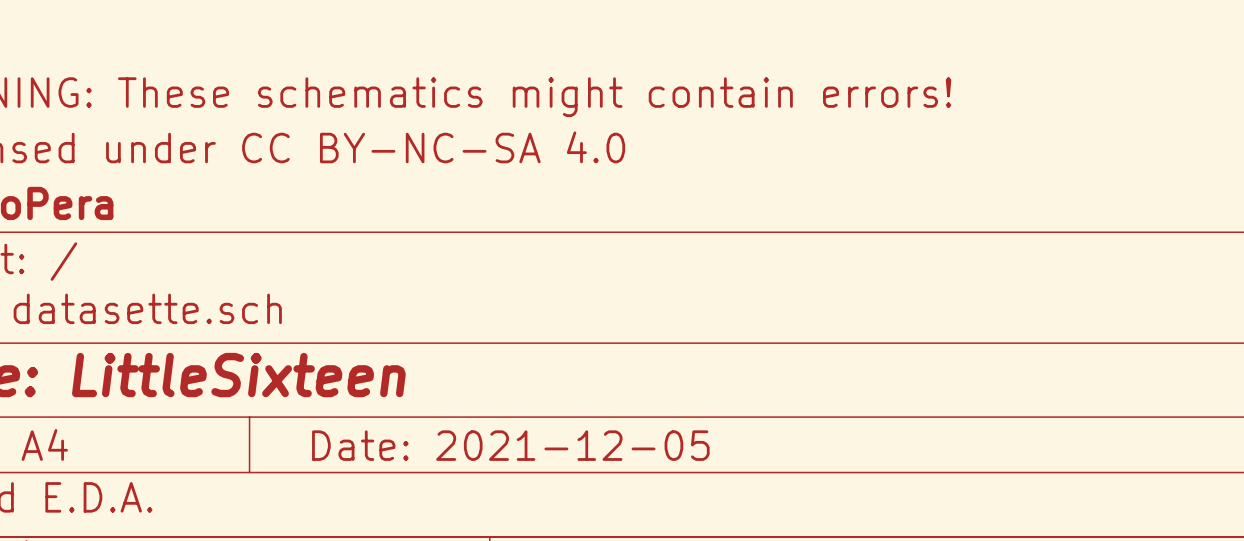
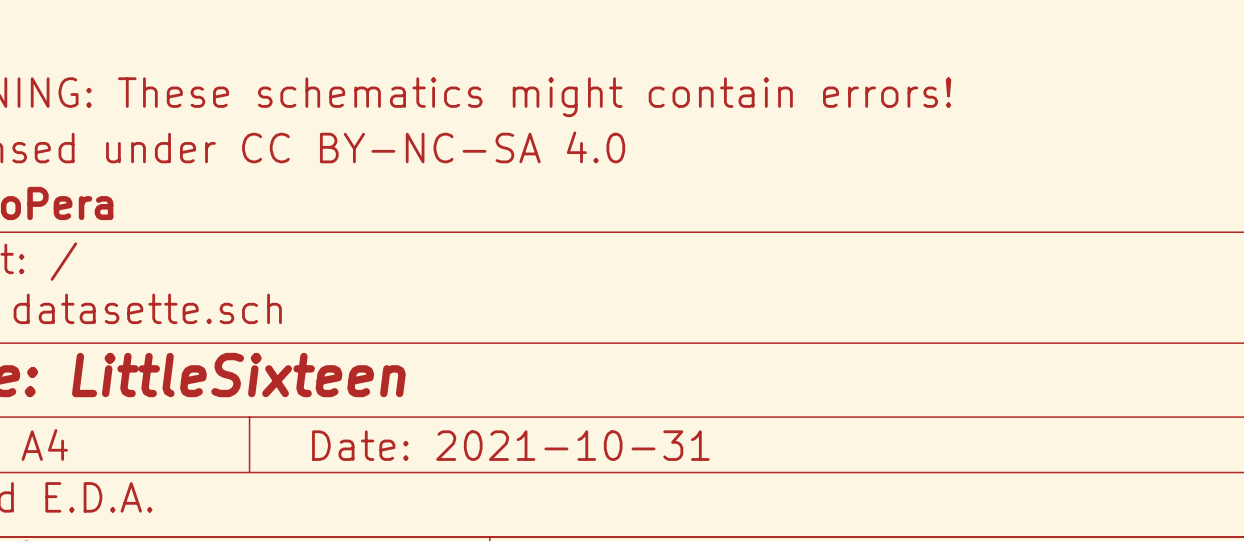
title block: Date: 2021-12-05 (510, 445) -> Date: 2021-10-31 (510, 445)

